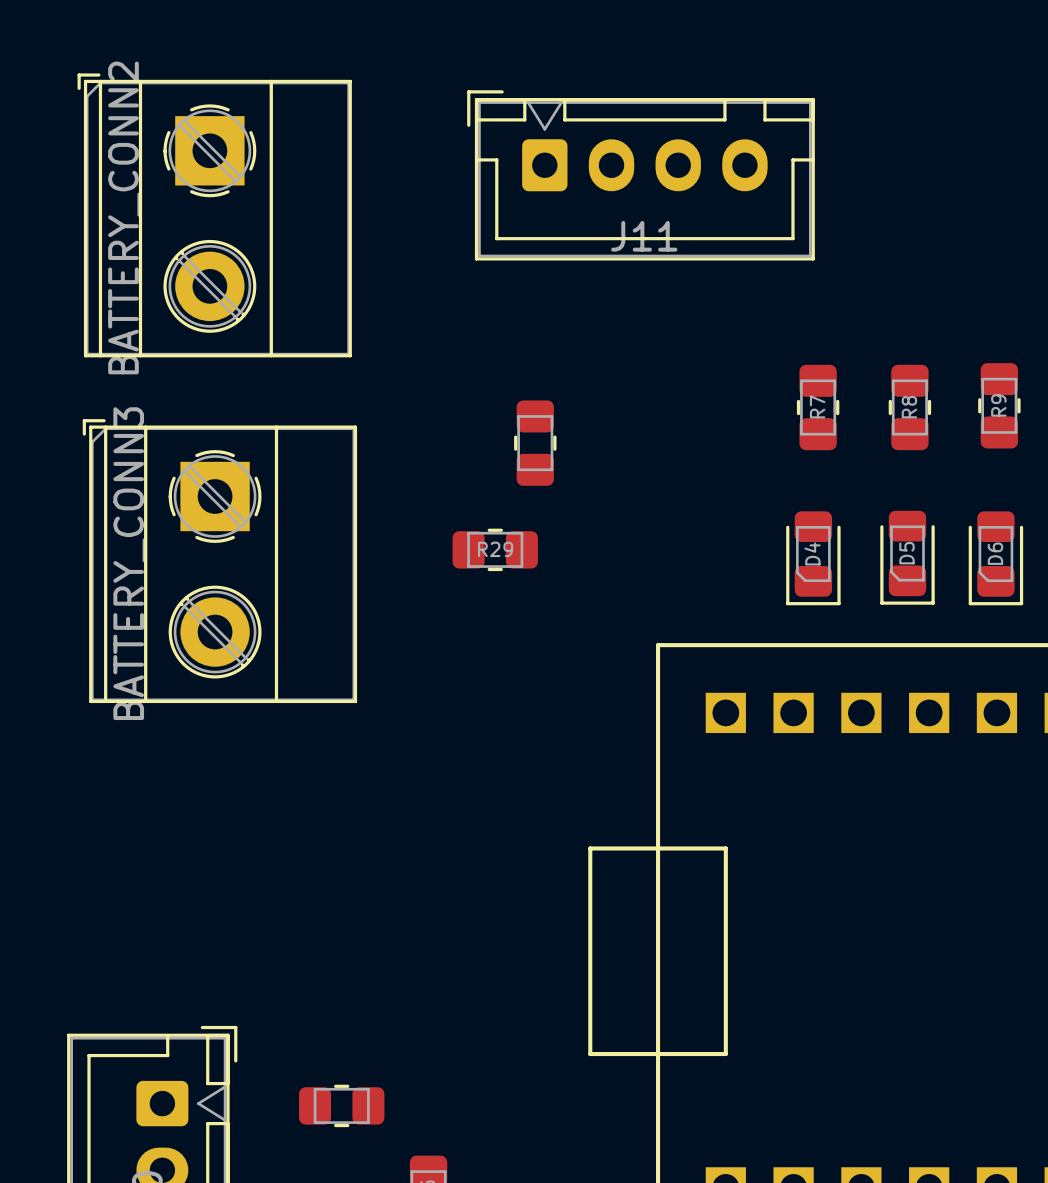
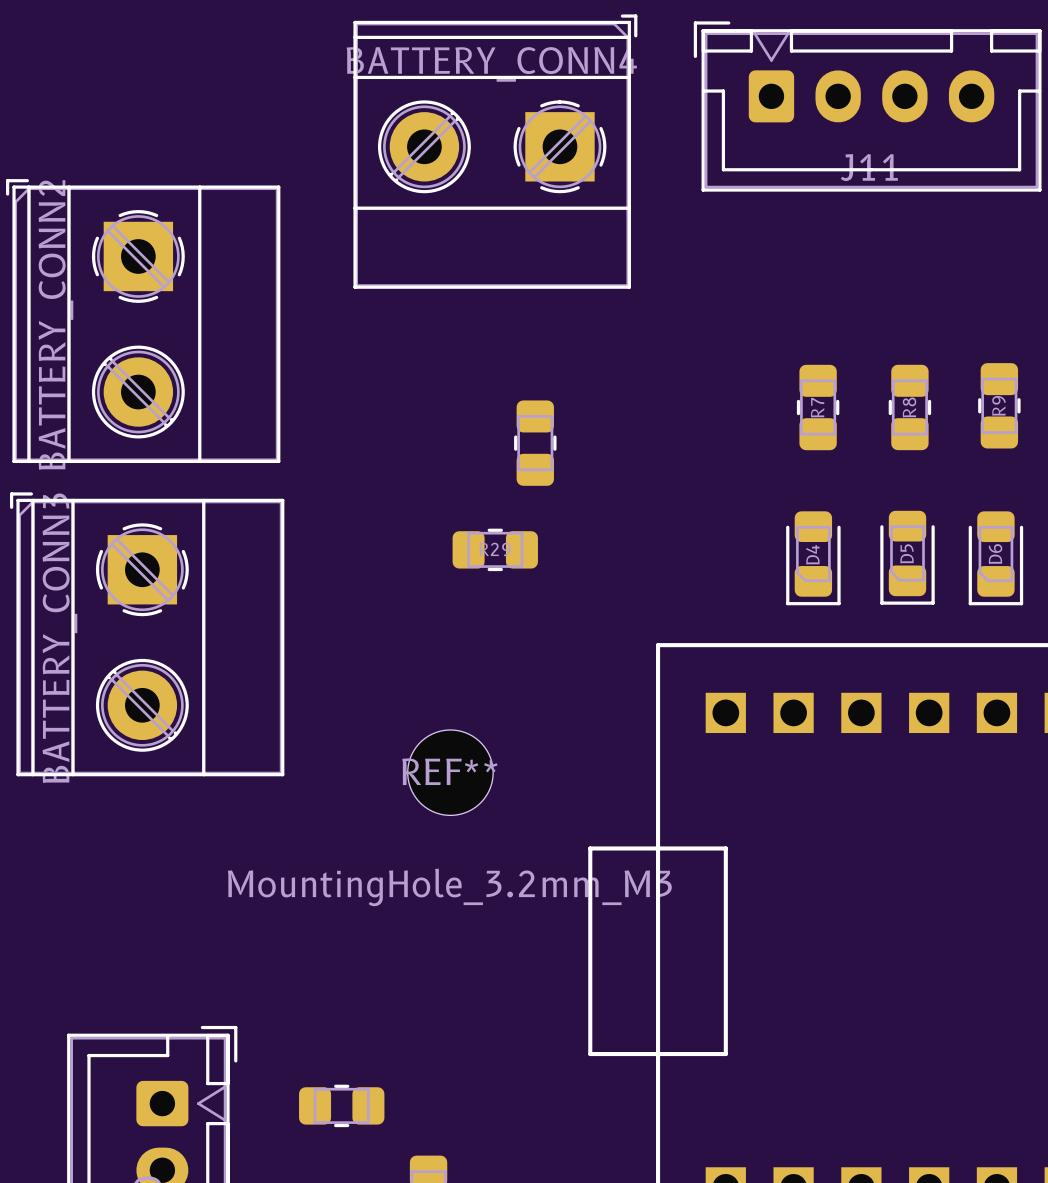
BATTERY_CONN4: none -> (495, 151)
J11 position: (641, 175) -> (867, 106)
BATTERY_CONN2 position: (214, 215) -> (143, 321)
BATTERY_CONN3 position: (219, 561) -> (147, 634)
REF**: none -> MountingHole_3.2mm_M3 (450, 772)

